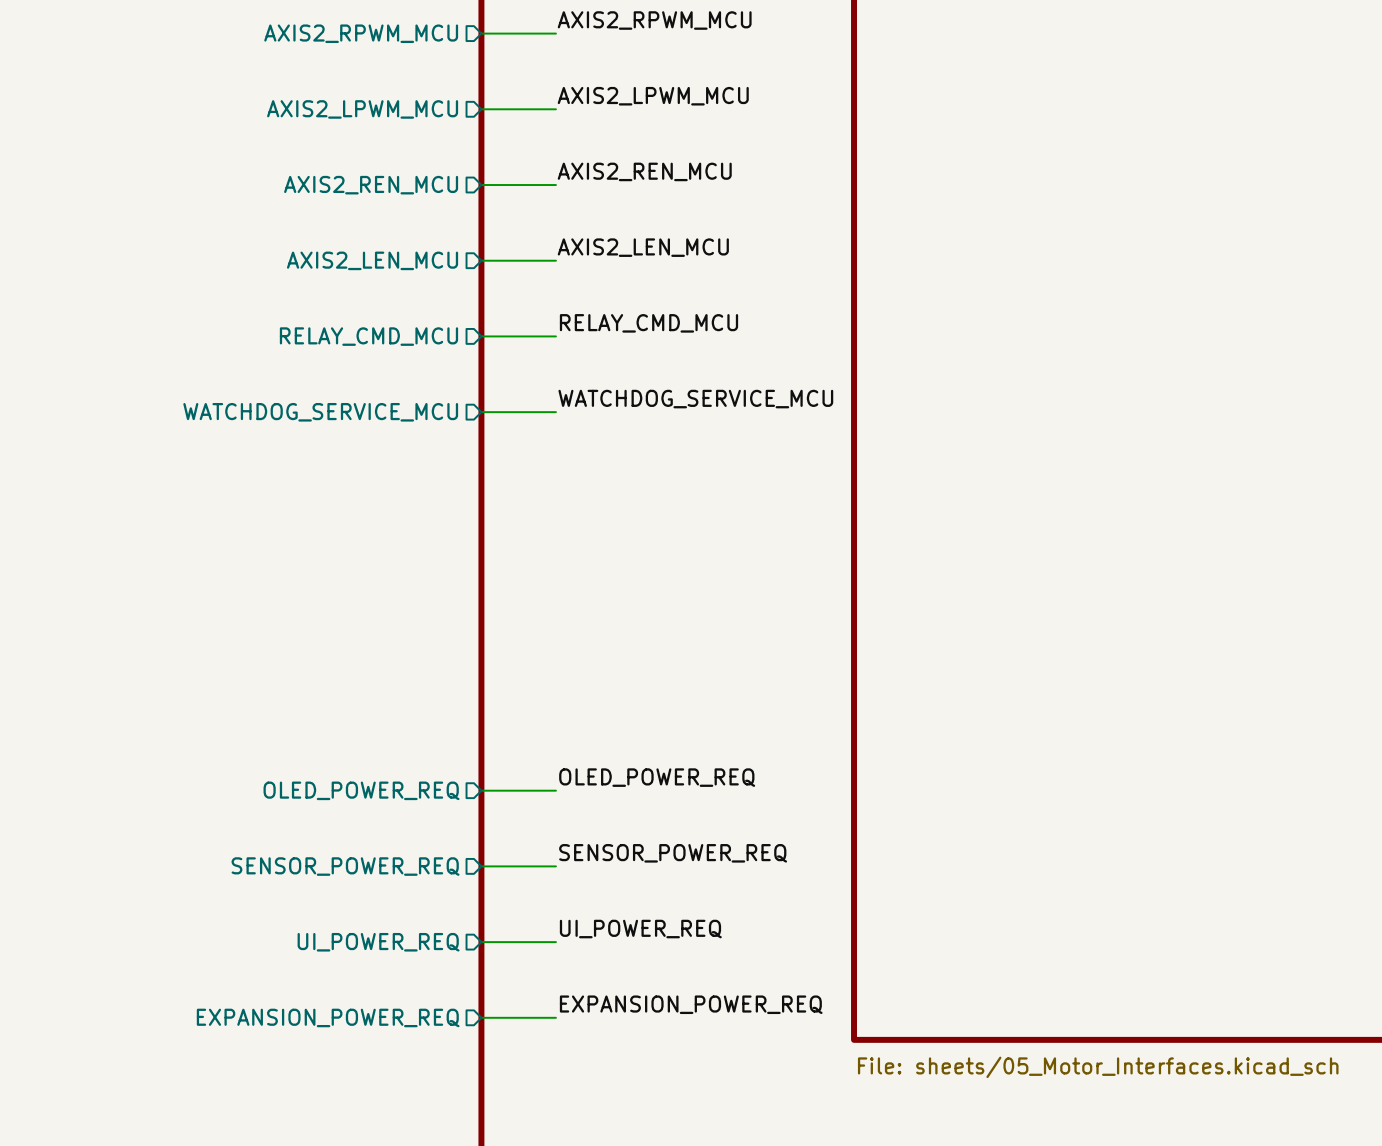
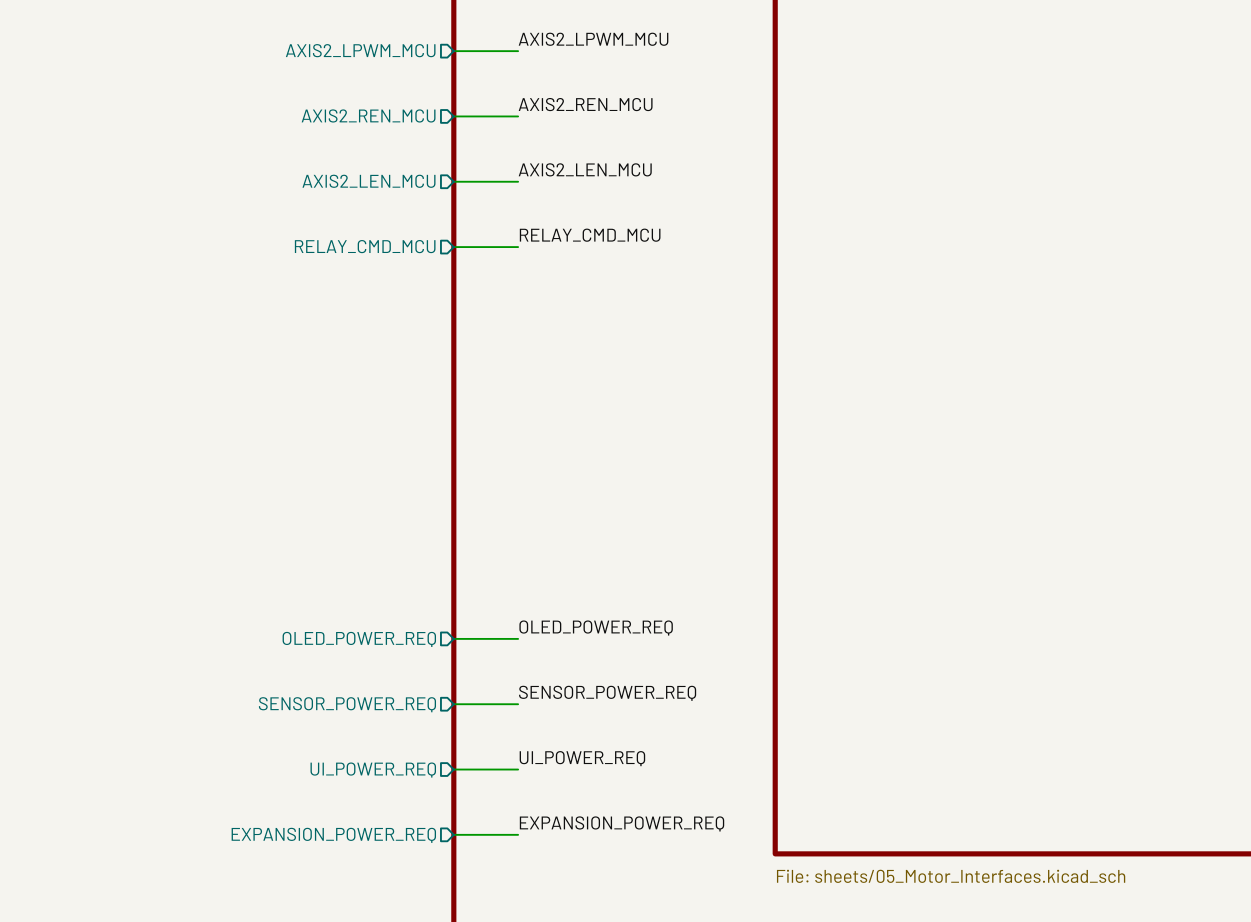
label: WATCHDOG_SERVICE_MCU (695, 399) -> none
sheet pin: WATCHDOG_SERVICE_MCU (320, 412) -> none
wire: (481, 412) (555, 412) -> none

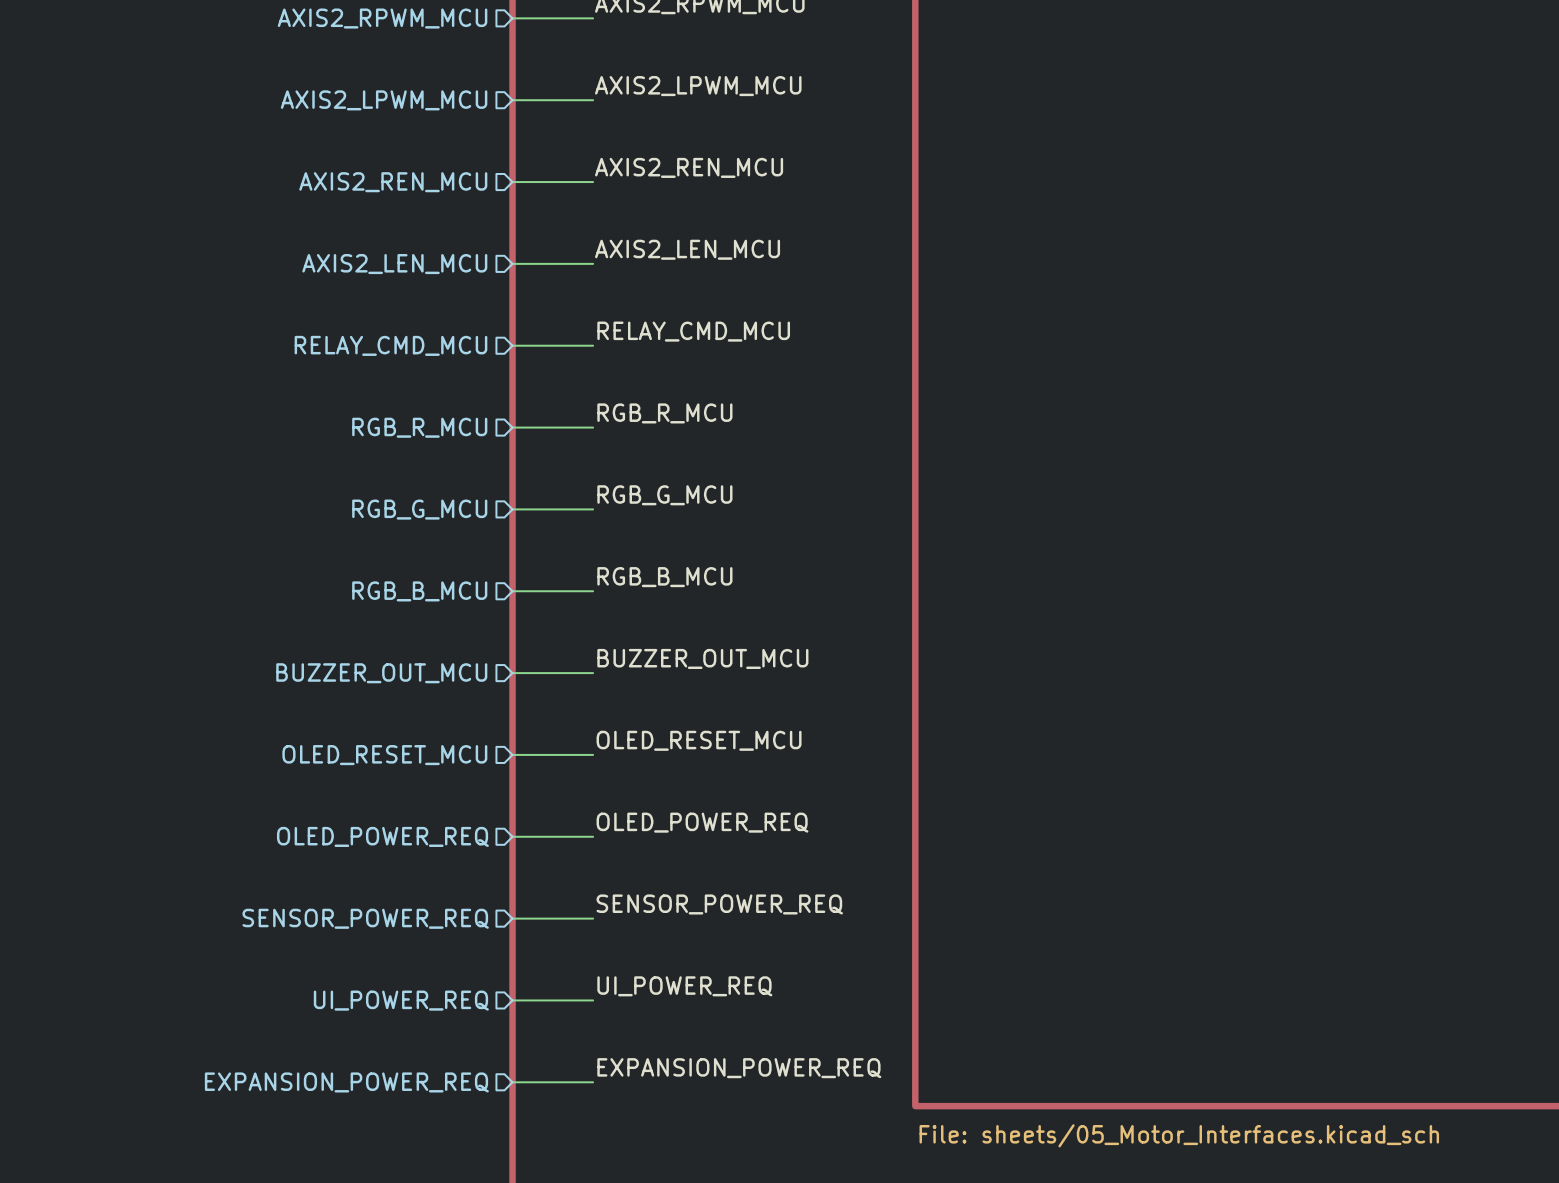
label: none -> RGB_R_MCU (664, 413)
sheet pin: none -> RGB_R_MCU (419, 427)
wire: none -> (512, 427) (593, 427)
label: none -> RGB_G_MCU (664, 495)
sheet pin: none -> RGB_G_MCU (419, 509)
wire: none -> (512, 509) (593, 509)
label: none -> RGB_B_MCU (664, 577)
sheet pin: none -> RGB_B_MCU (419, 591)
wire: none -> (512, 591) (593, 591)
label: none -> BUZZER_OUT_MCU (702, 658)
sheet pin: none -> BUZZER_OUT_MCU (381, 673)
wire: none -> (512, 673) (593, 673)
label: none -> OLED_RESET_MCU (699, 740)
sheet pin: none -> OLED_RESET_MCU (384, 755)
wire: none -> (512, 754) (593, 754)

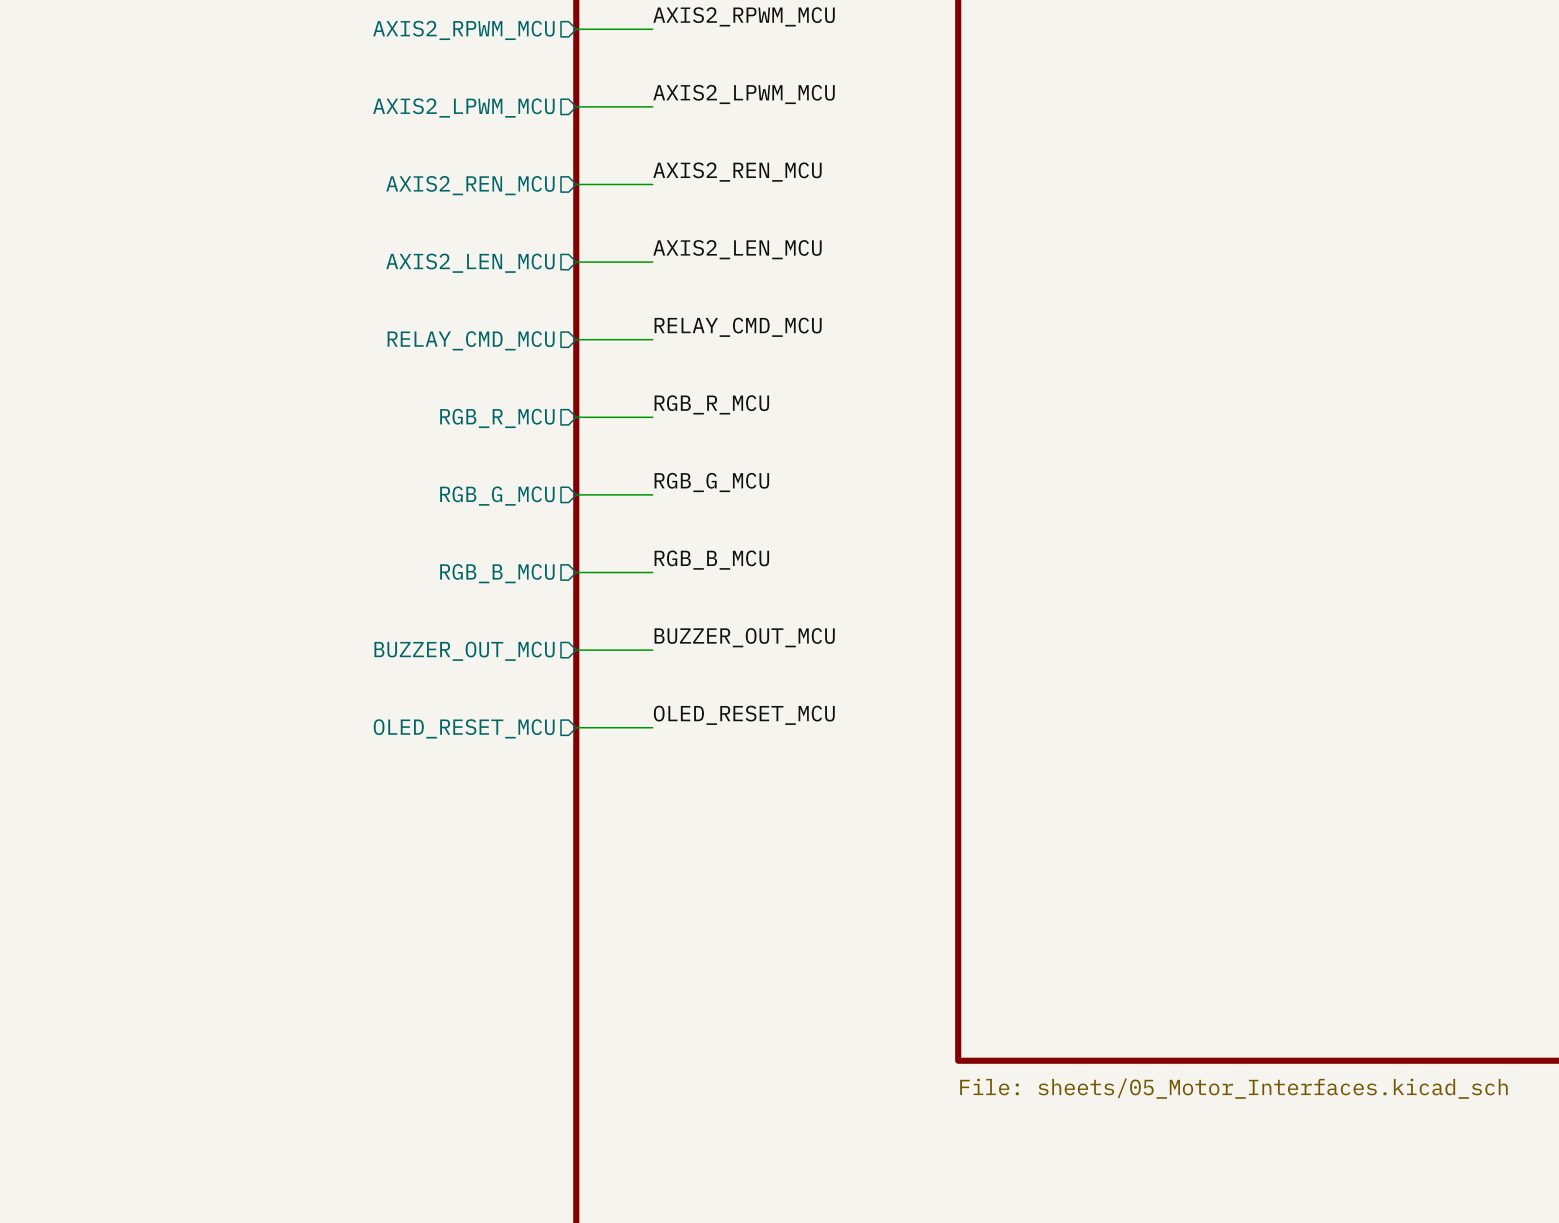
label: OLED_POWER_REQ (702, 822) -> none
sheet pin: OLED_POWER_REQ (382, 836) -> none
wire: (512, 836) (593, 836) -> none
label: SENSOR_POWER_REQ (719, 904) -> none
sheet pin: SENSOR_POWER_REQ (365, 918) -> none
wire: (512, 918) (593, 918) -> none
label: UI_POWER_REQ (684, 986) -> none
sheet pin: UI_POWER_REQ (401, 1000) -> none
wire: (512, 1000) (593, 1000) -> none
label: EXPANSION_POWER_REQ (739, 1068) -> none
sheet pin: EXPANSION_POWER_REQ (346, 1082) -> none
wire: (512, 1082) (593, 1082) -> none

